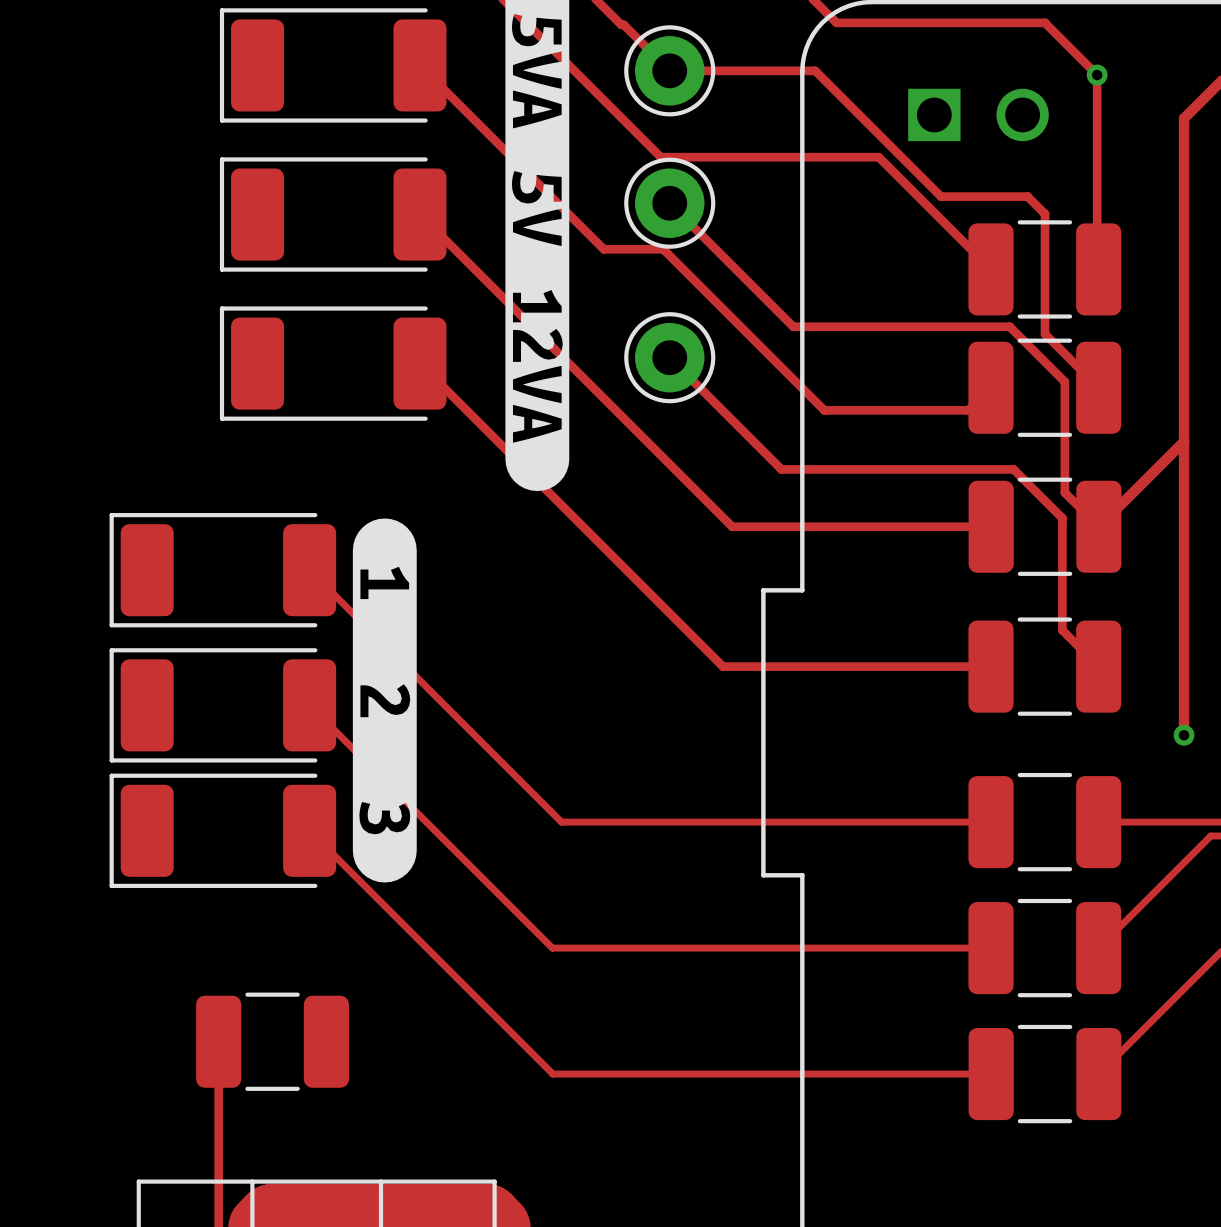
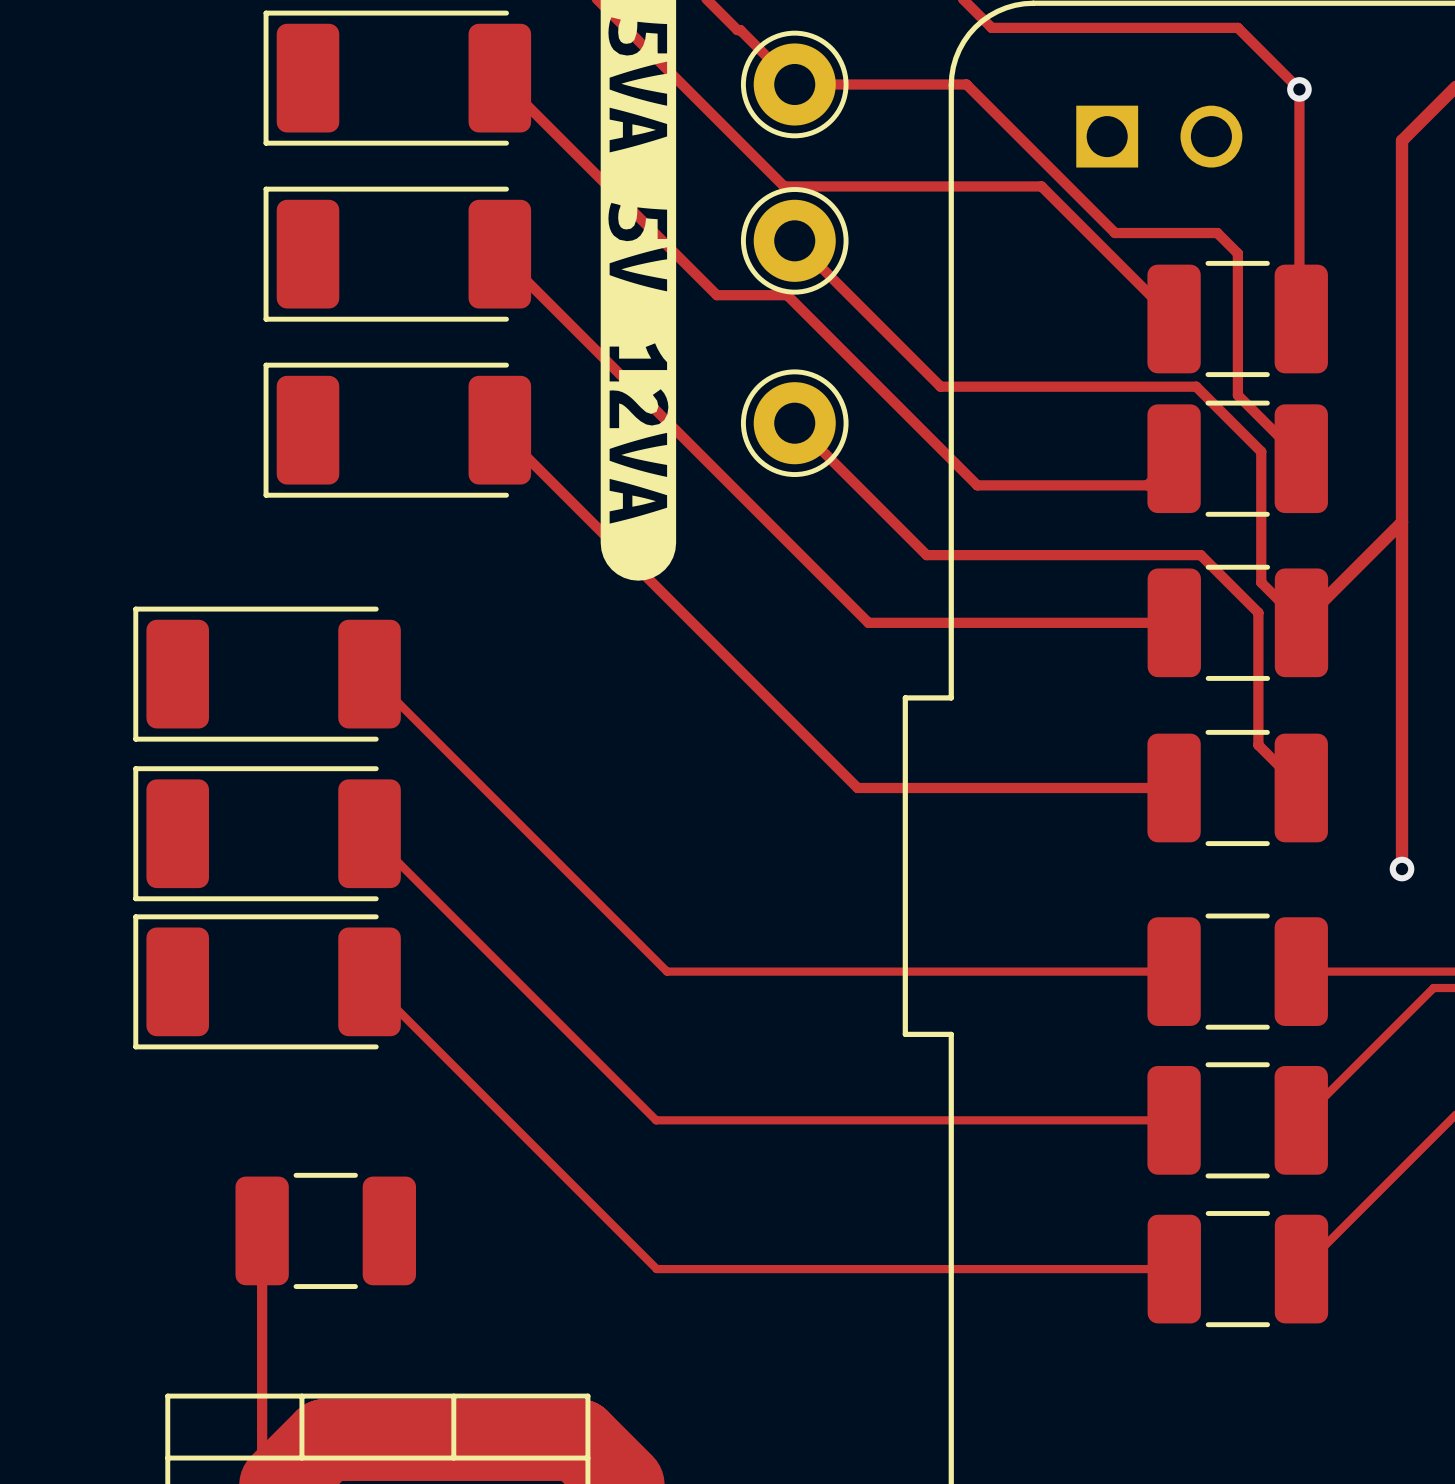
drawing: [352, 518, 417, 883] -> none

